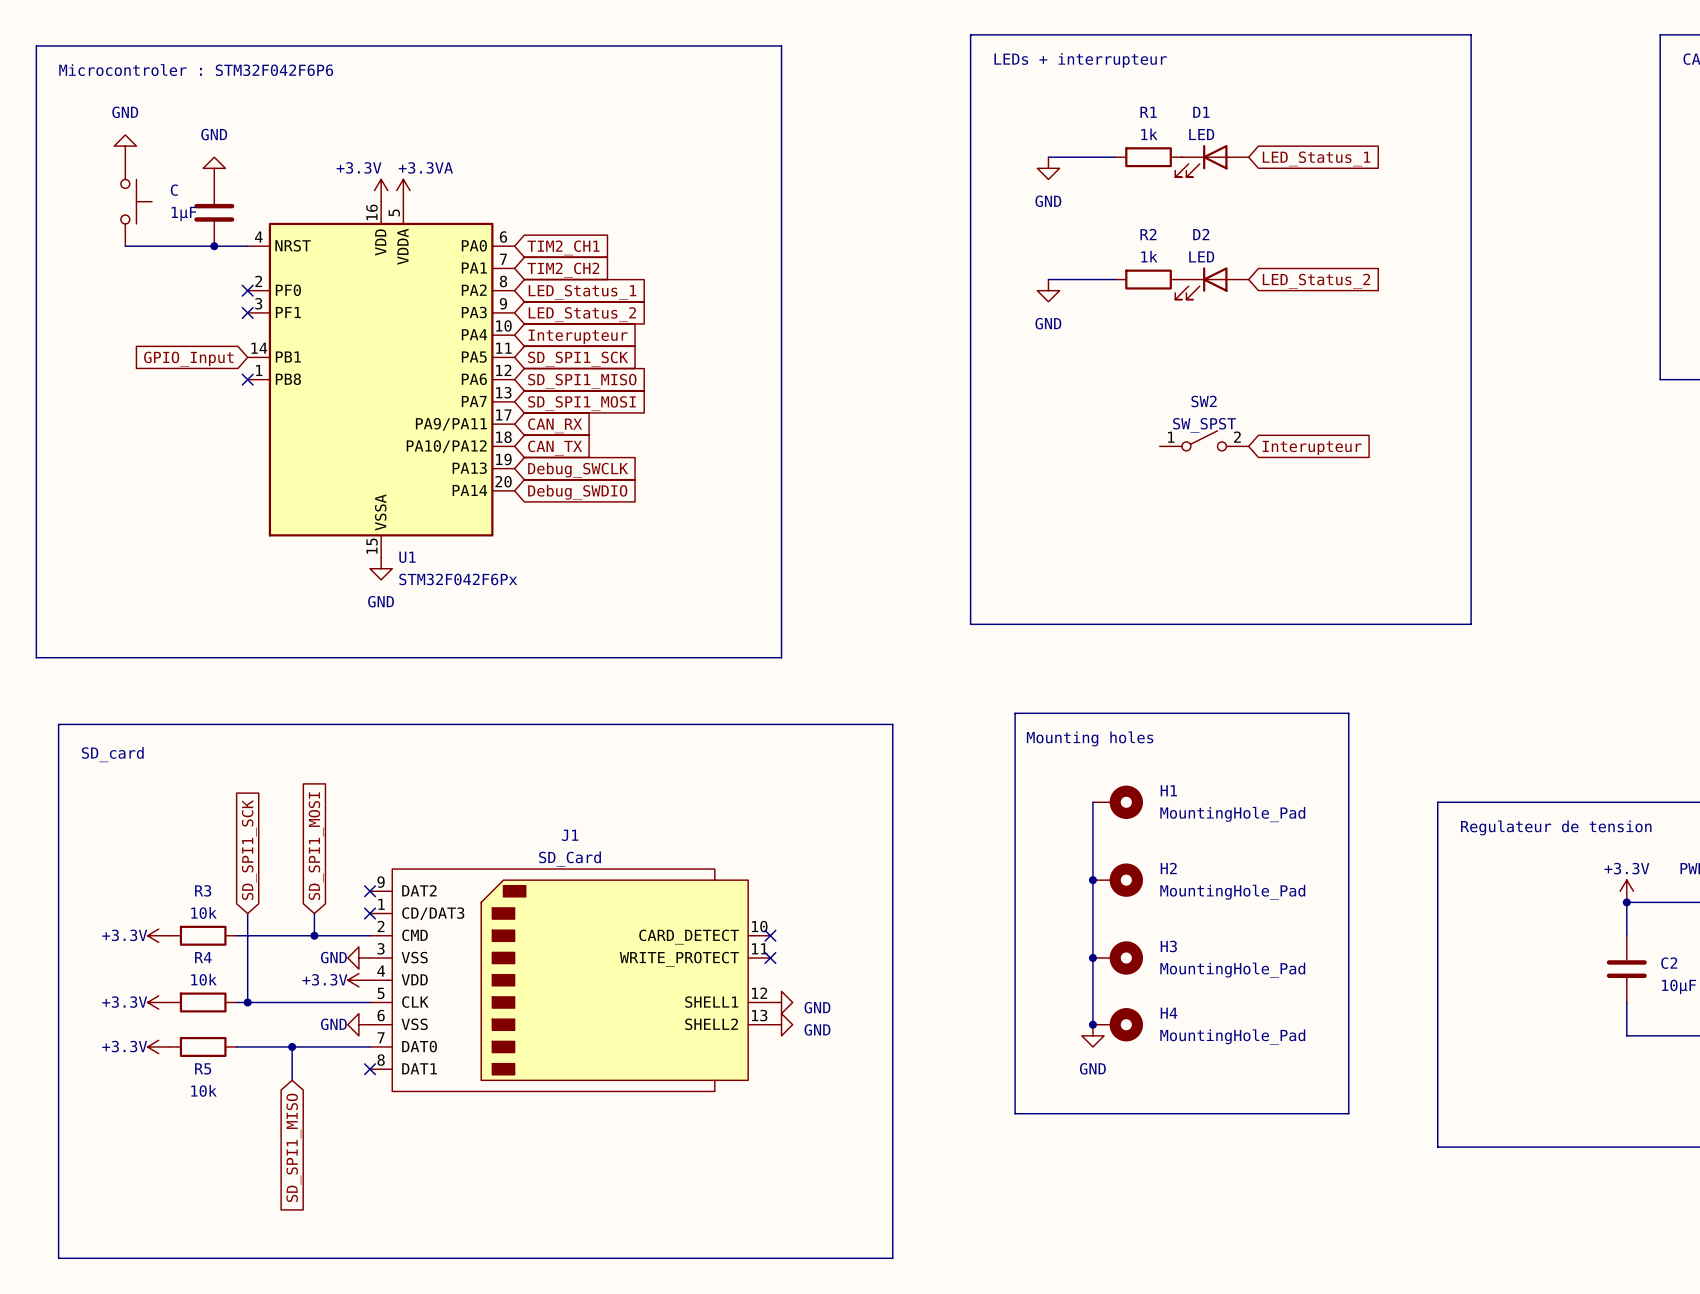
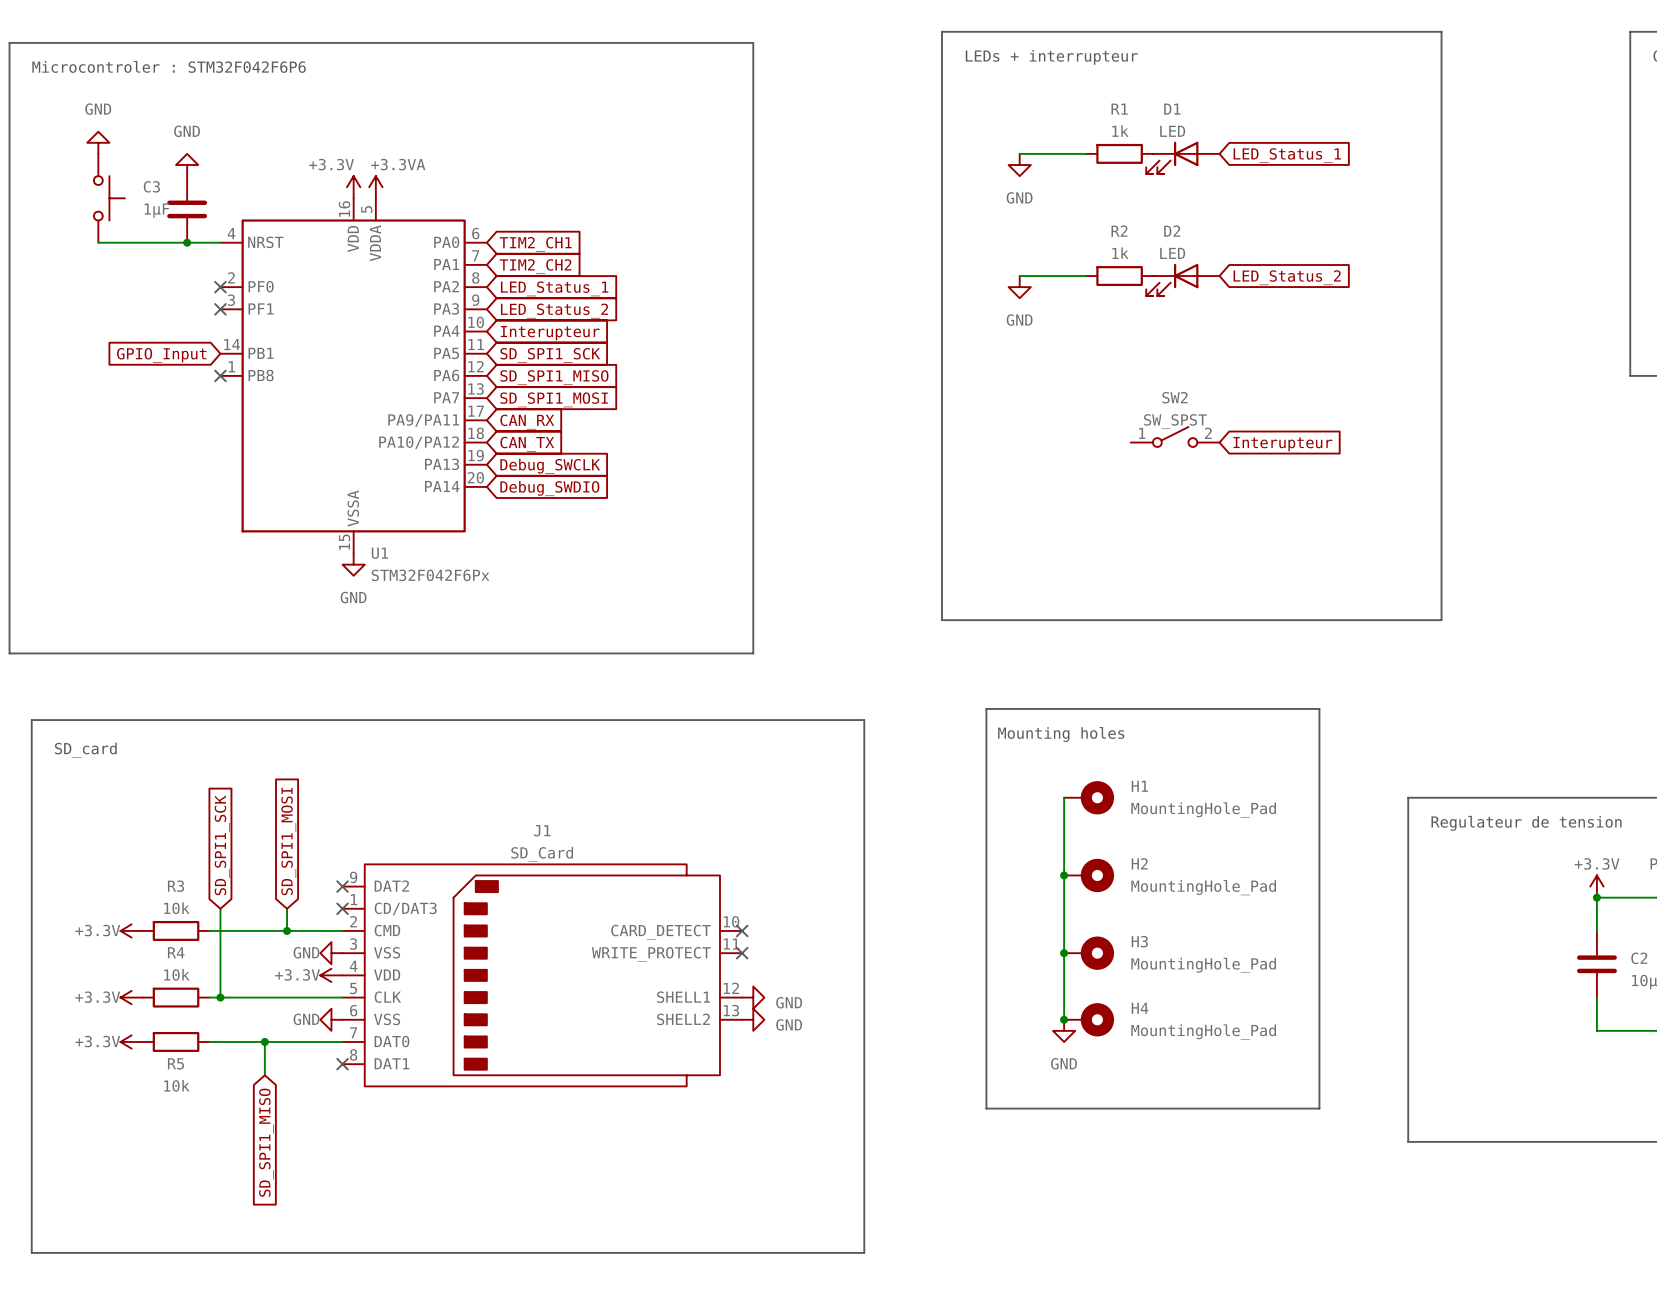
C name: C (174, 190) -> C3 (151, 186)

